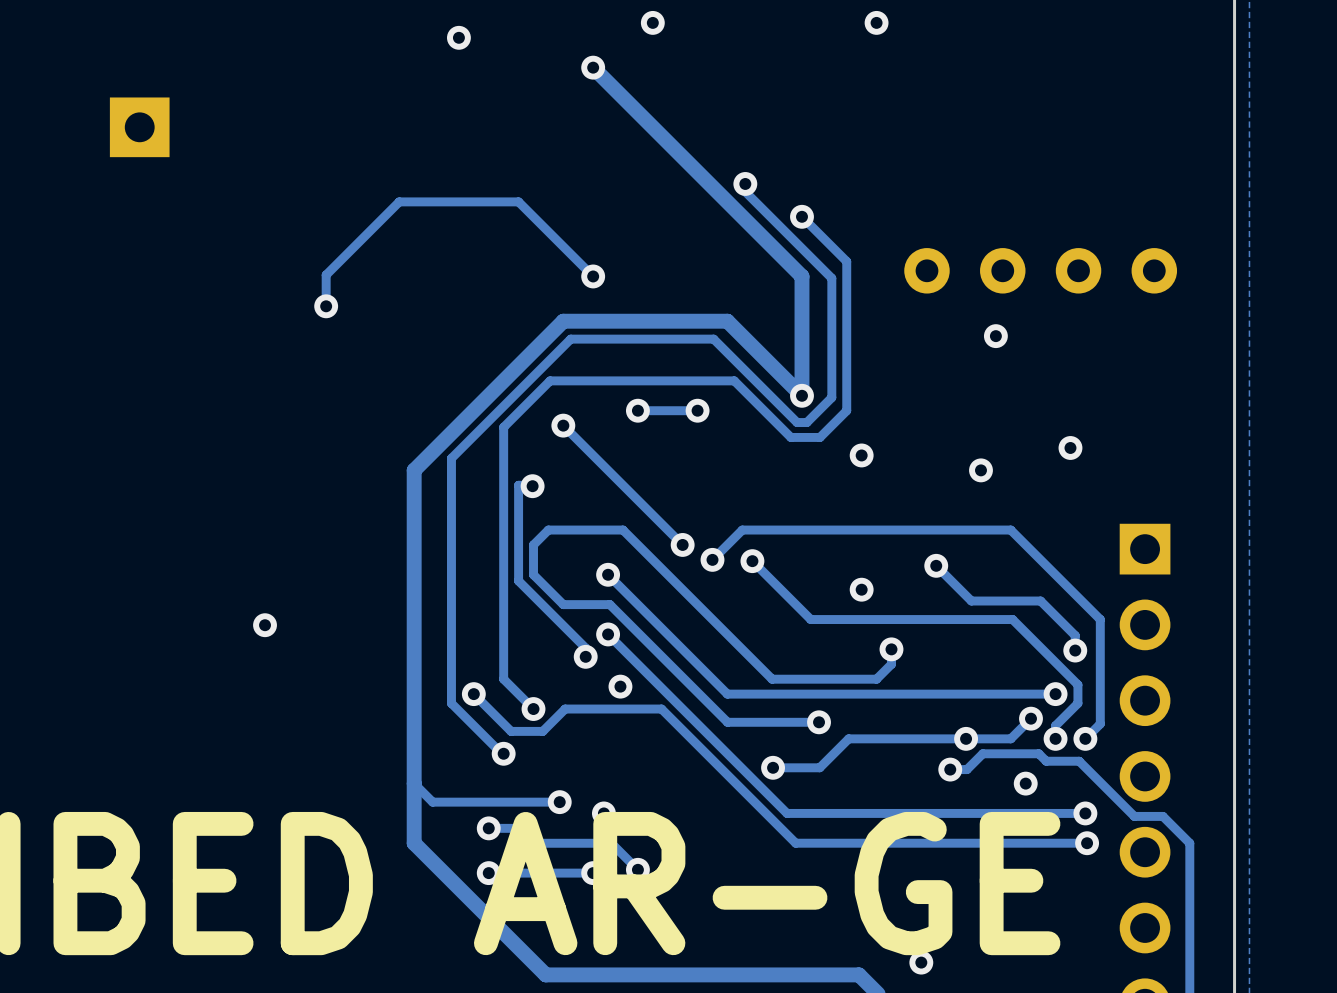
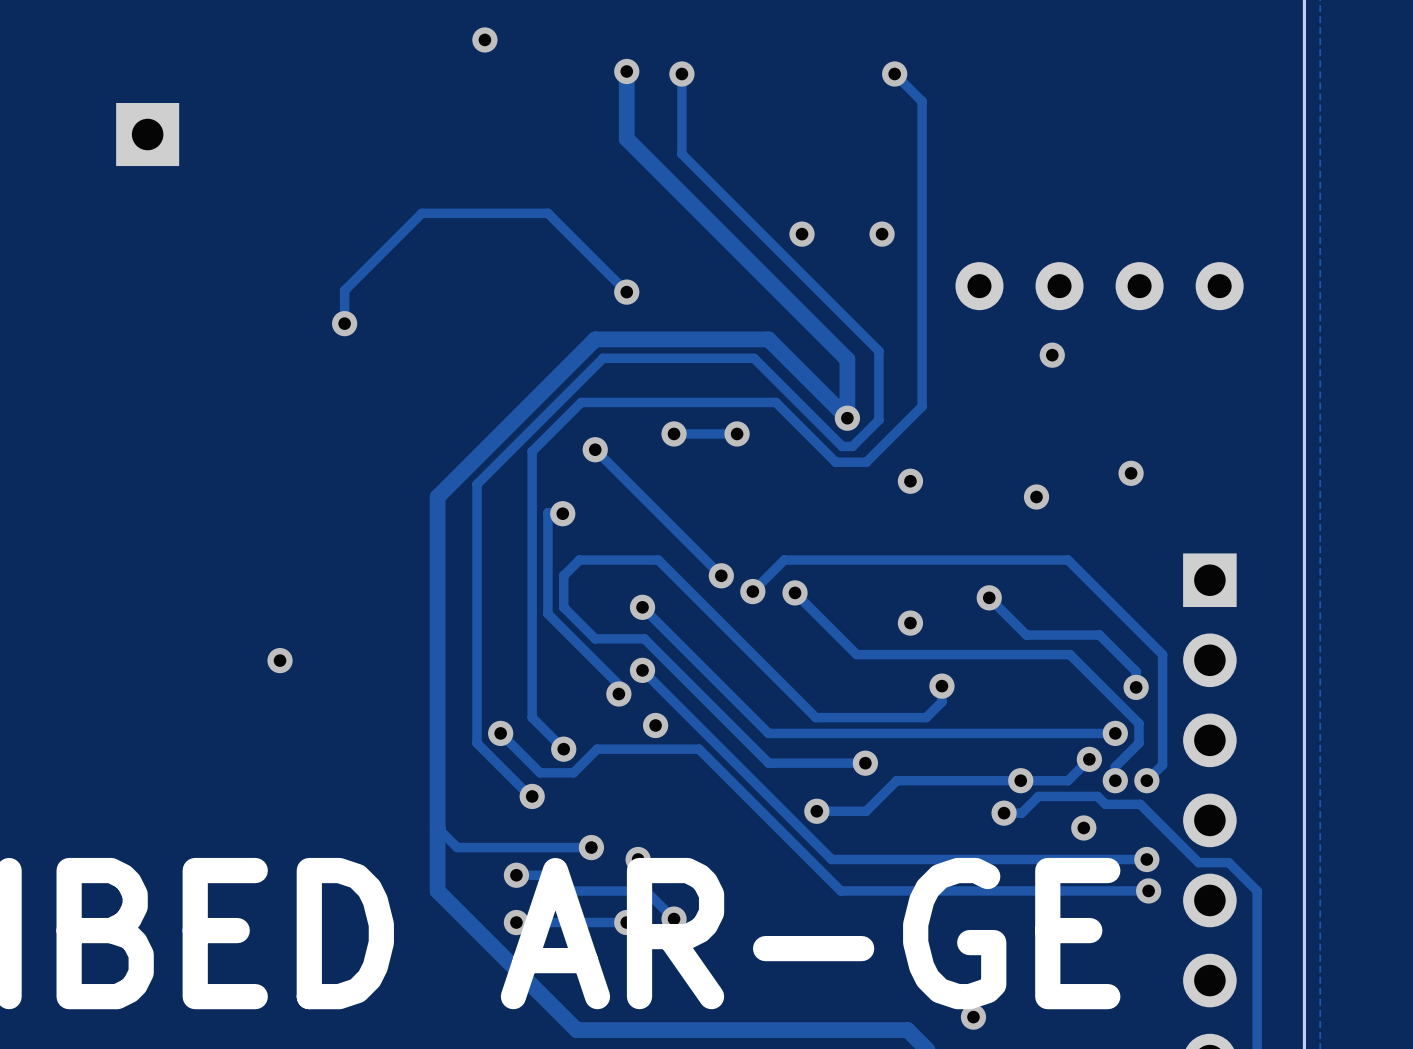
via position: (652, 22) -> (681, 74)
via position: (876, 22) -> (894, 74)
track: (593, 67) (801, 276) (801, 340) -> (626, 71) (626, 138) (847, 359)
track: (745, 183) (745, 191) (831, 278) (831, 332) -> (681, 74) (681, 154) (878, 351)
via: (745, 183) -> none
track: (801, 216) (846, 261) (846, 410) -> (894, 74) (922, 101) (922, 406) (894, 433)
via: (801, 216) -> none
via: none -> (802, 234)
via: none -> (882, 234)

